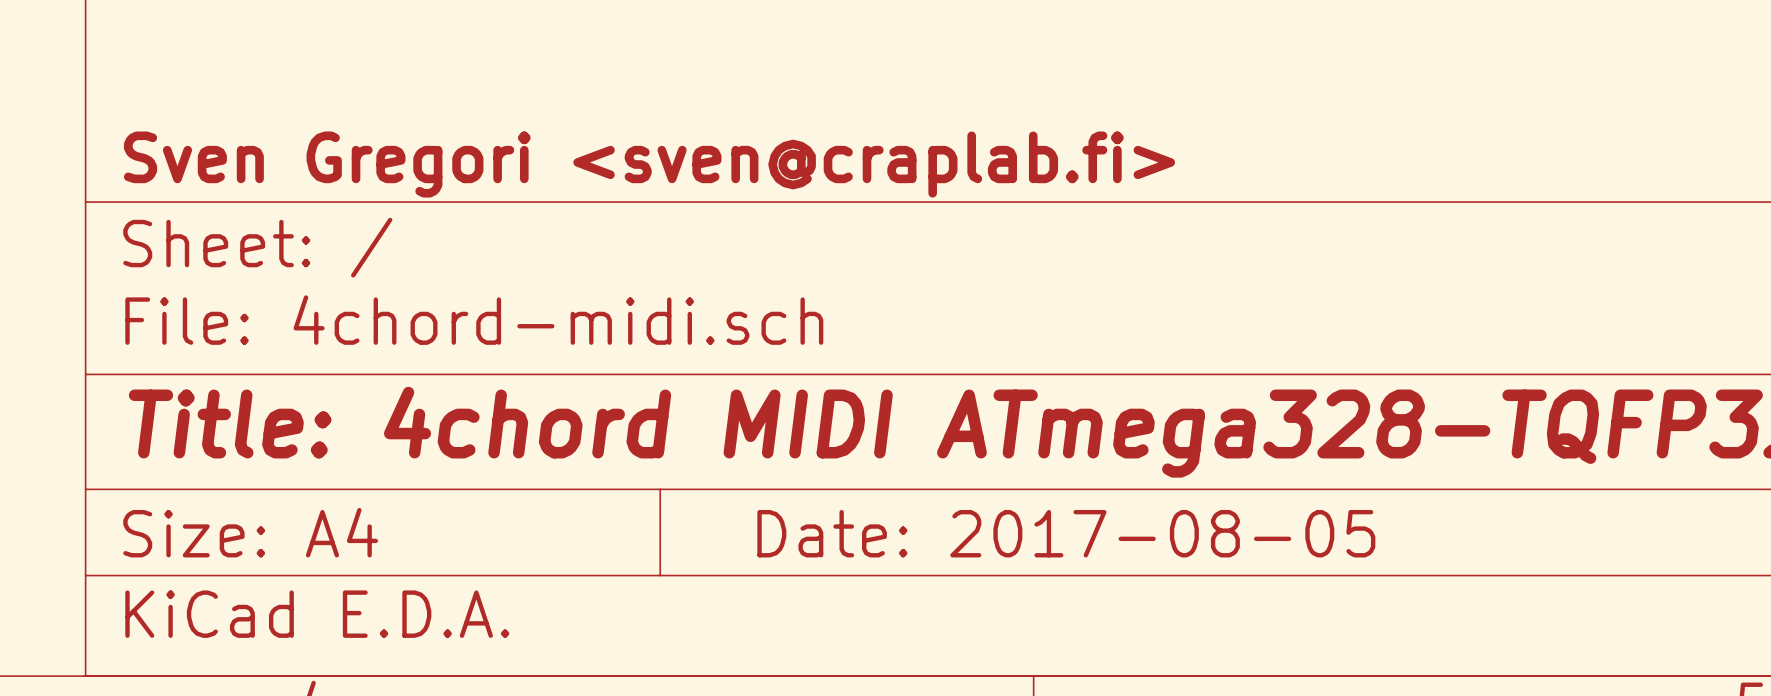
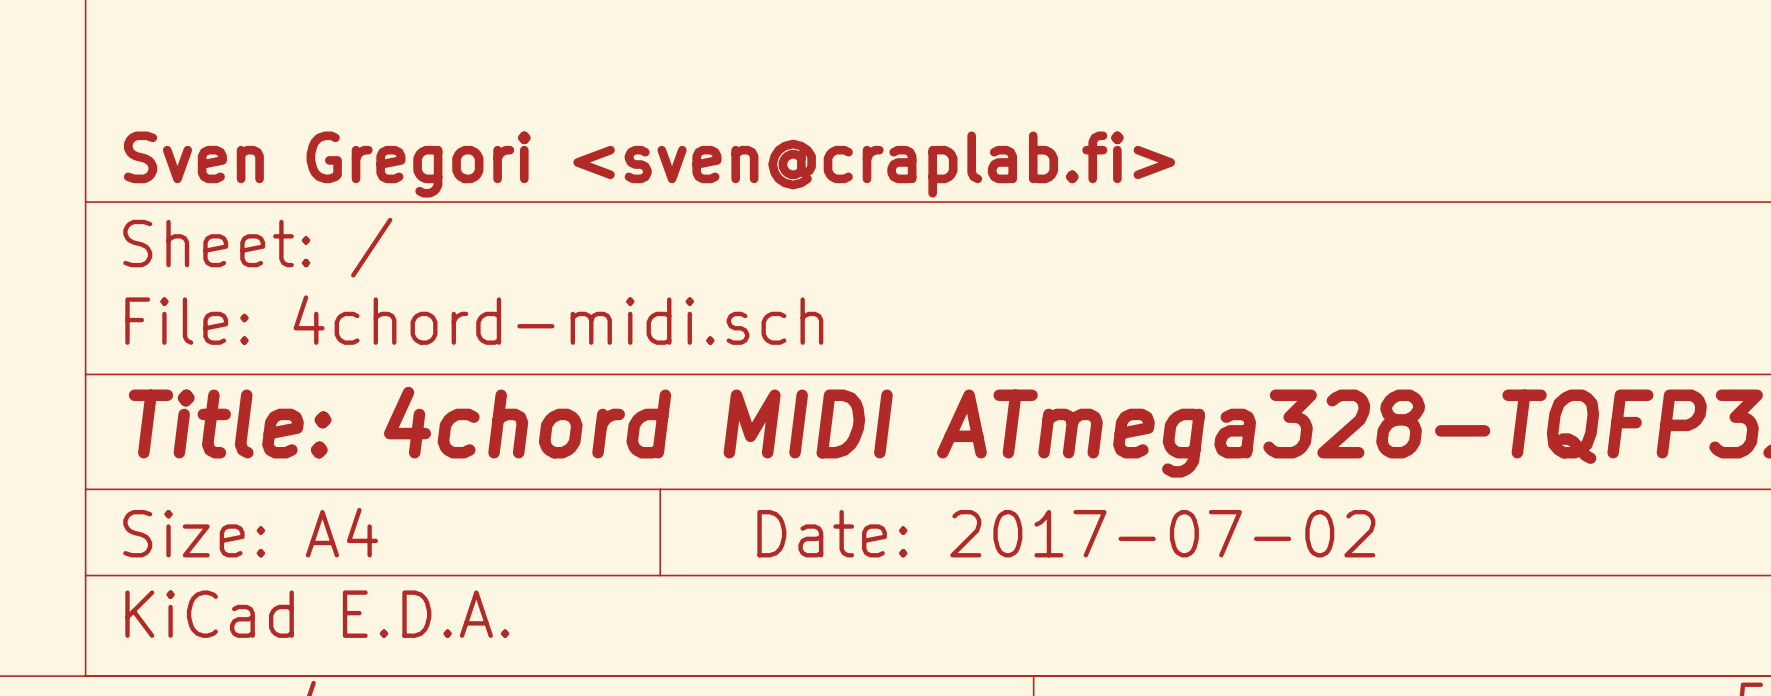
title block: Date: 2017-08-05 (1066, 533) -> Date: 2017-07-02 (1066, 533)

